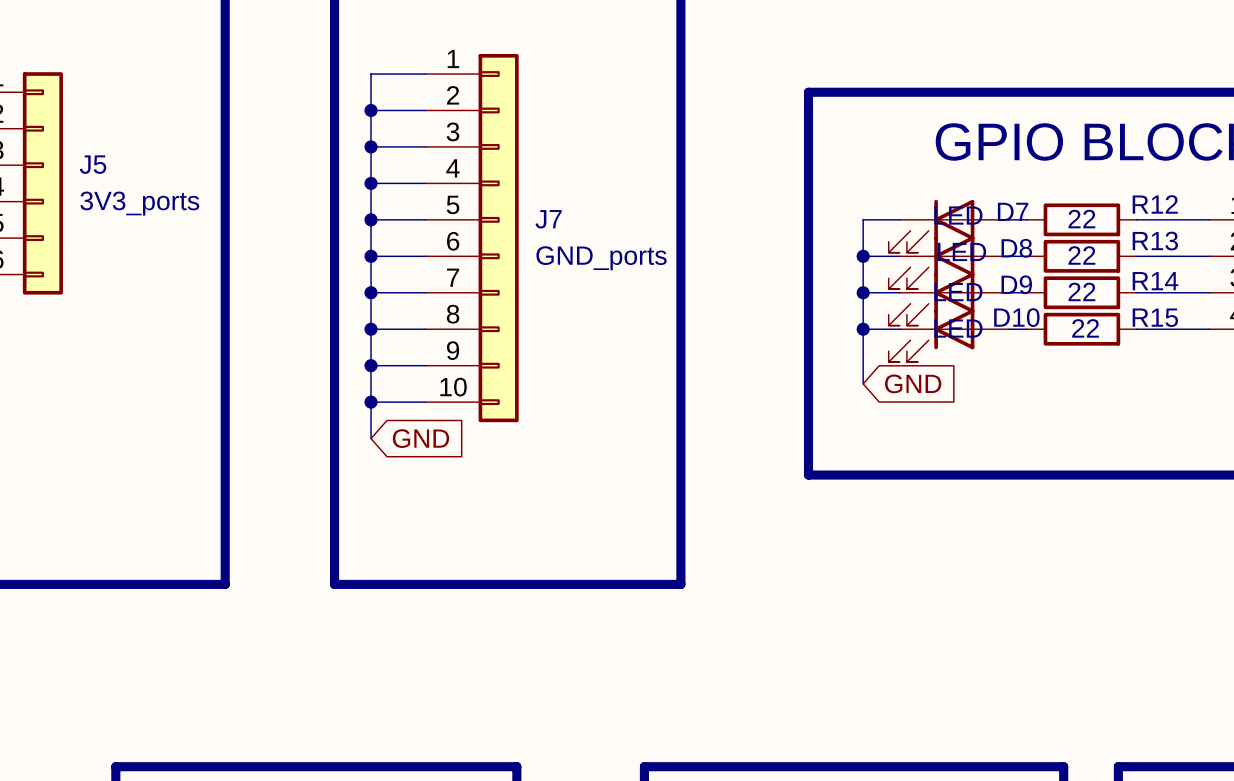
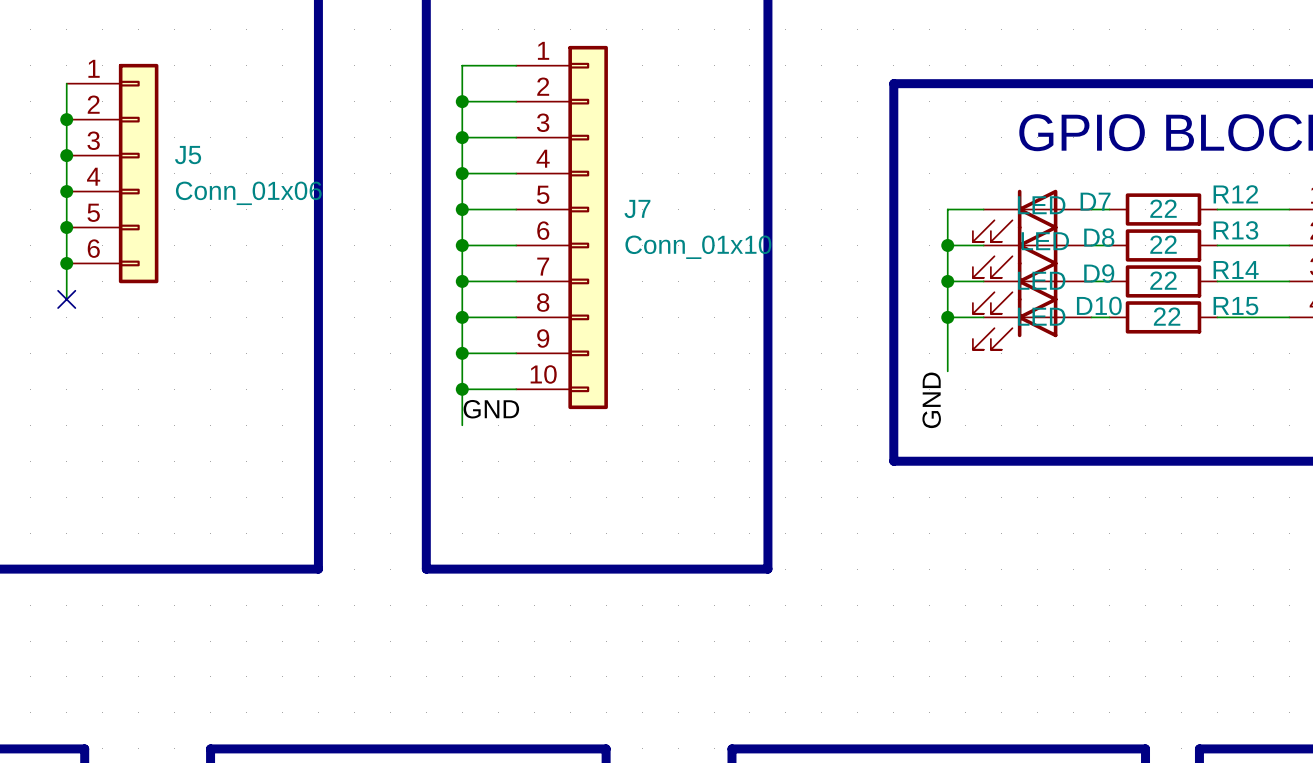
J5 value: 3V3_ports (139, 203) -> Conn_01x06 (248, 193)
J7 value: GND_ports (601, 258) -> Conn_01x10 (698, 247)
global label: GND (913, 383) -> none
label: none -> GND (931, 400)
label: none -> GND (491, 409)
global label: GND (421, 438) -> none

